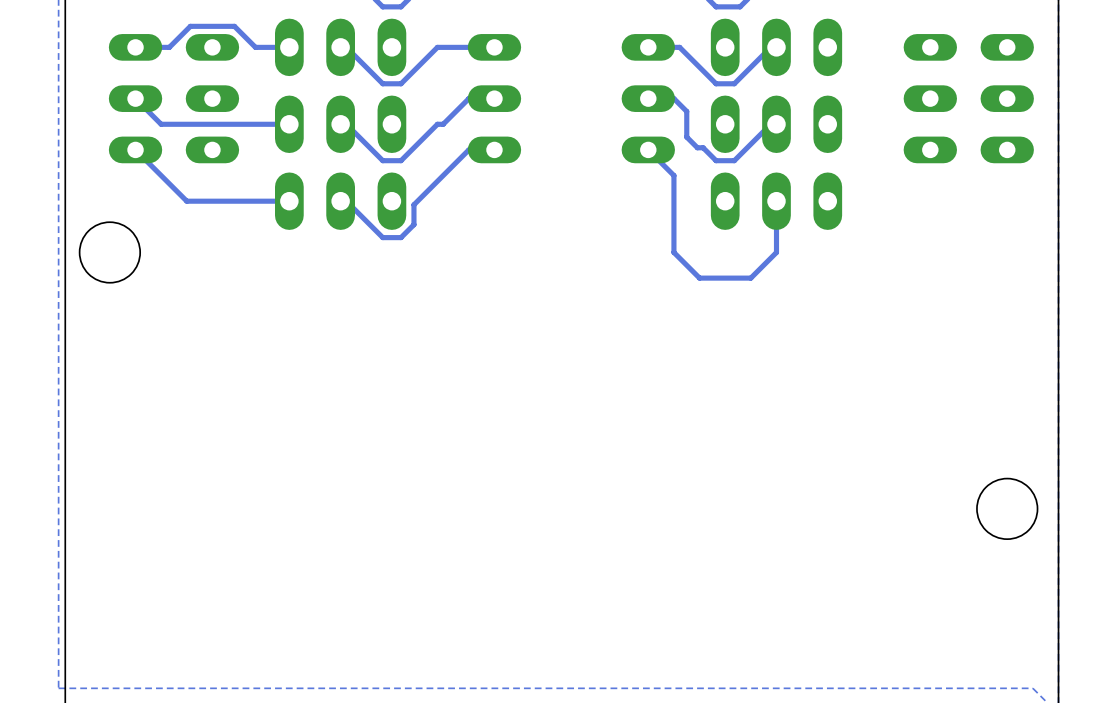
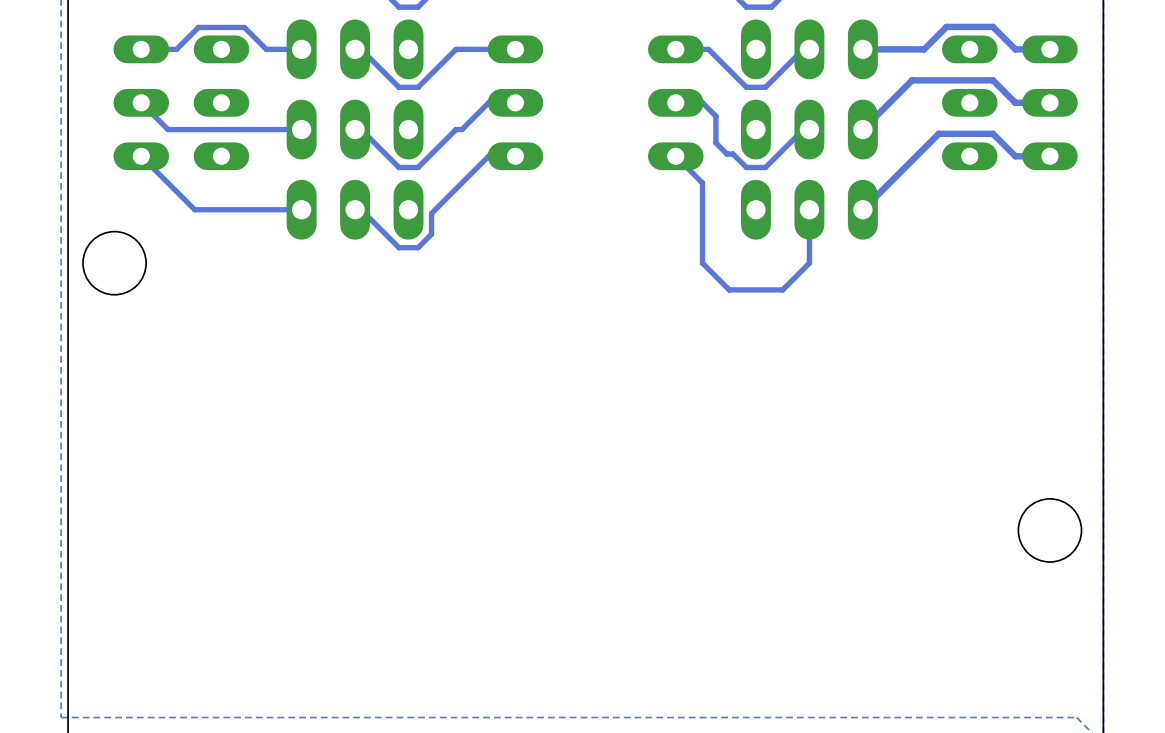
track: none -> (1049, 49) (1015, 49) (992, 26) (946, 26) (924, 49) (862, 49)
track: none -> (1049, 102) (1015, 102) (992, 80) (912, 80) (862, 129)
track: none -> (1049, 156) (1015, 156) (992, 133) (938, 133) (862, 209)

